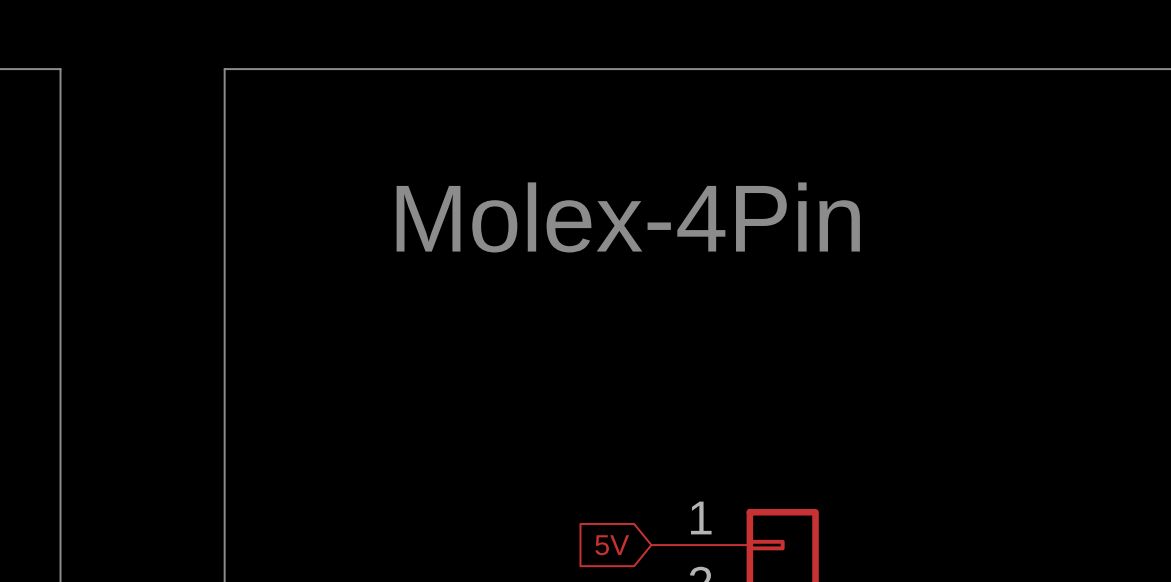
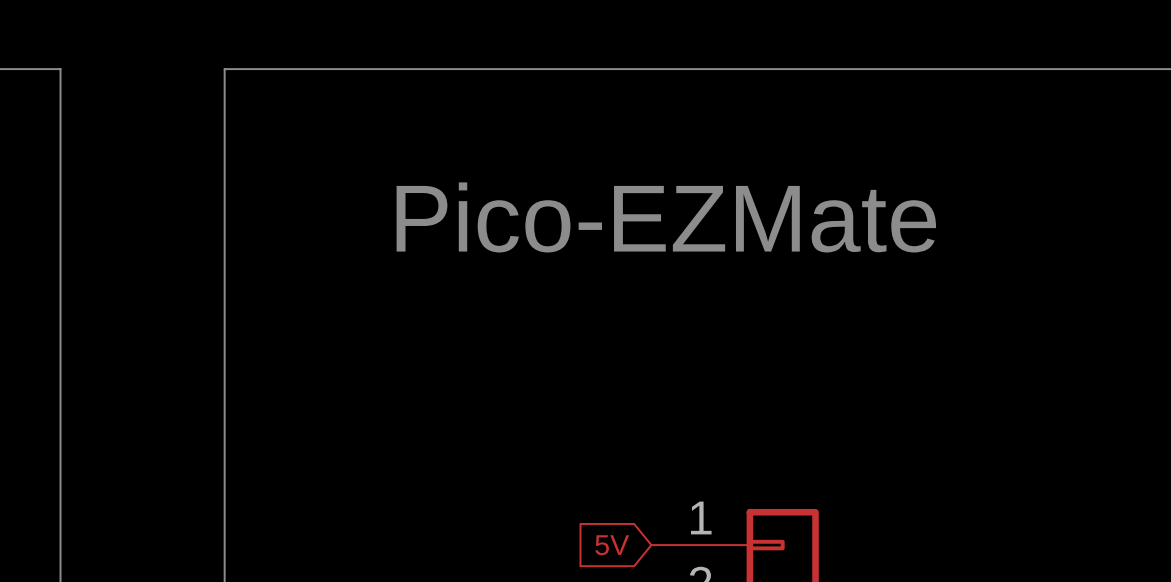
text: Molex-4Pin (628, 217) -> Pico-EZMate (666, 217)

